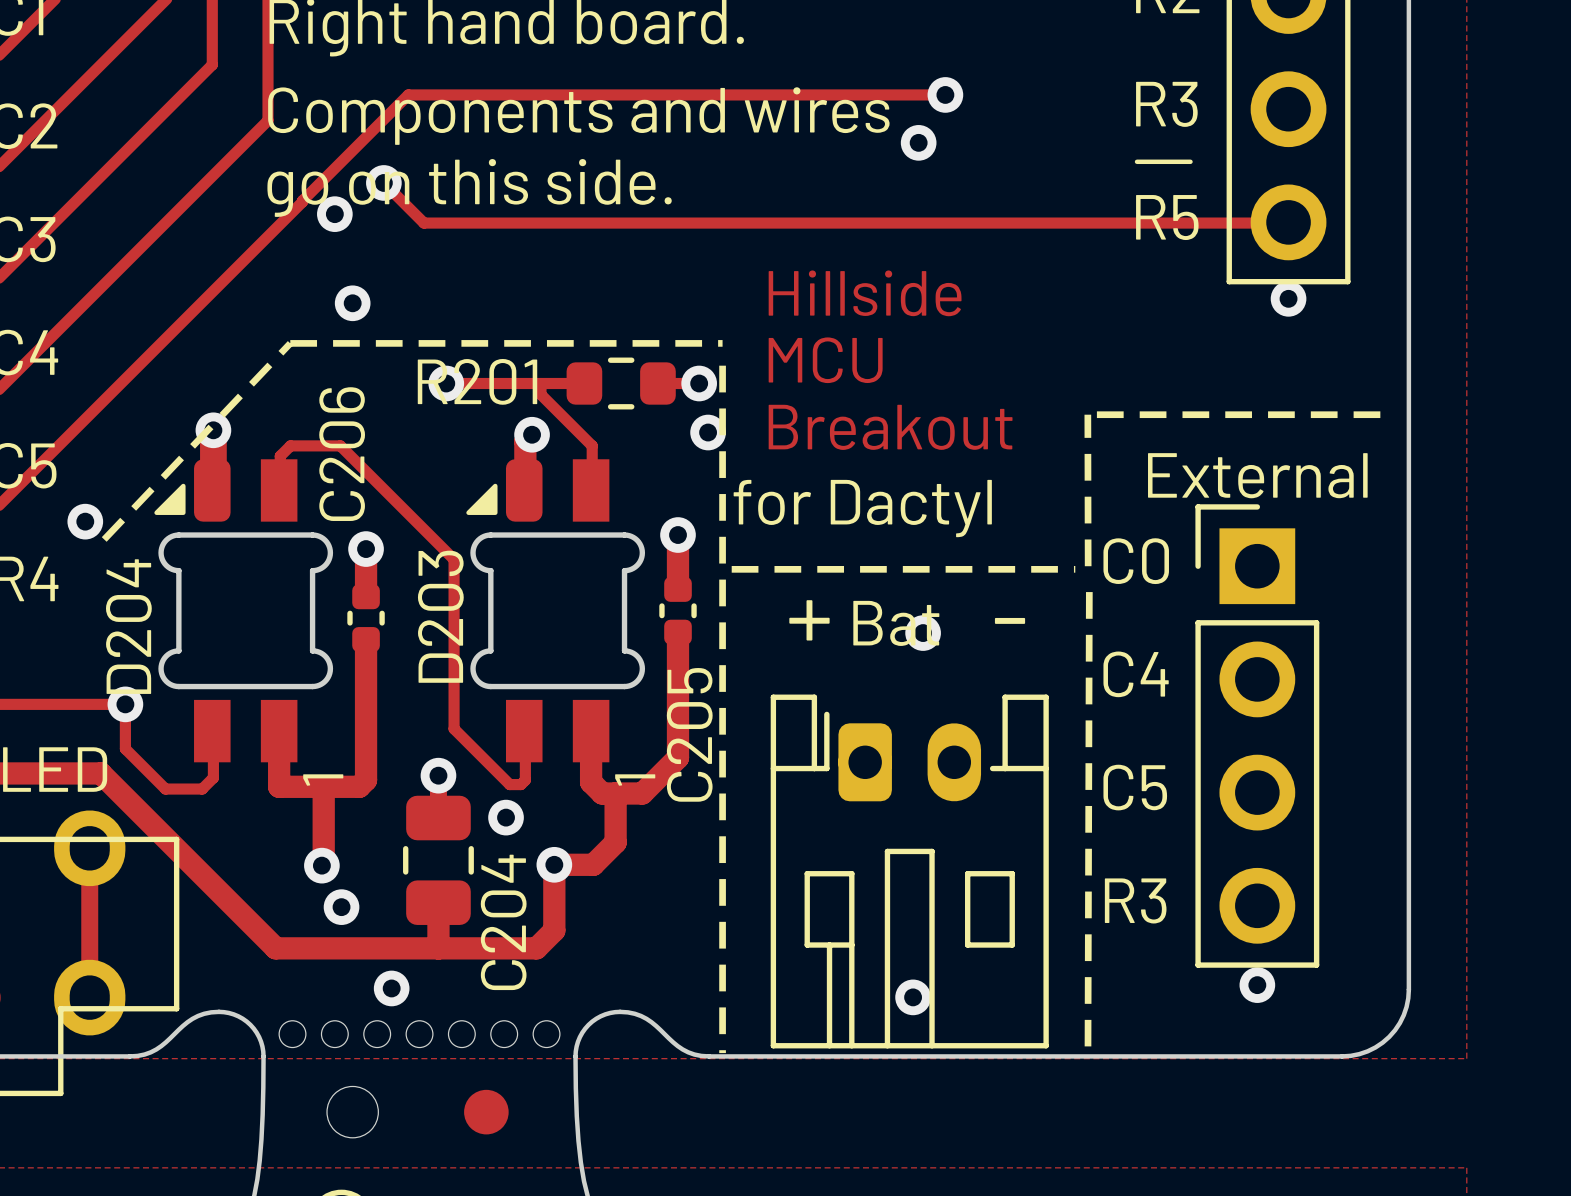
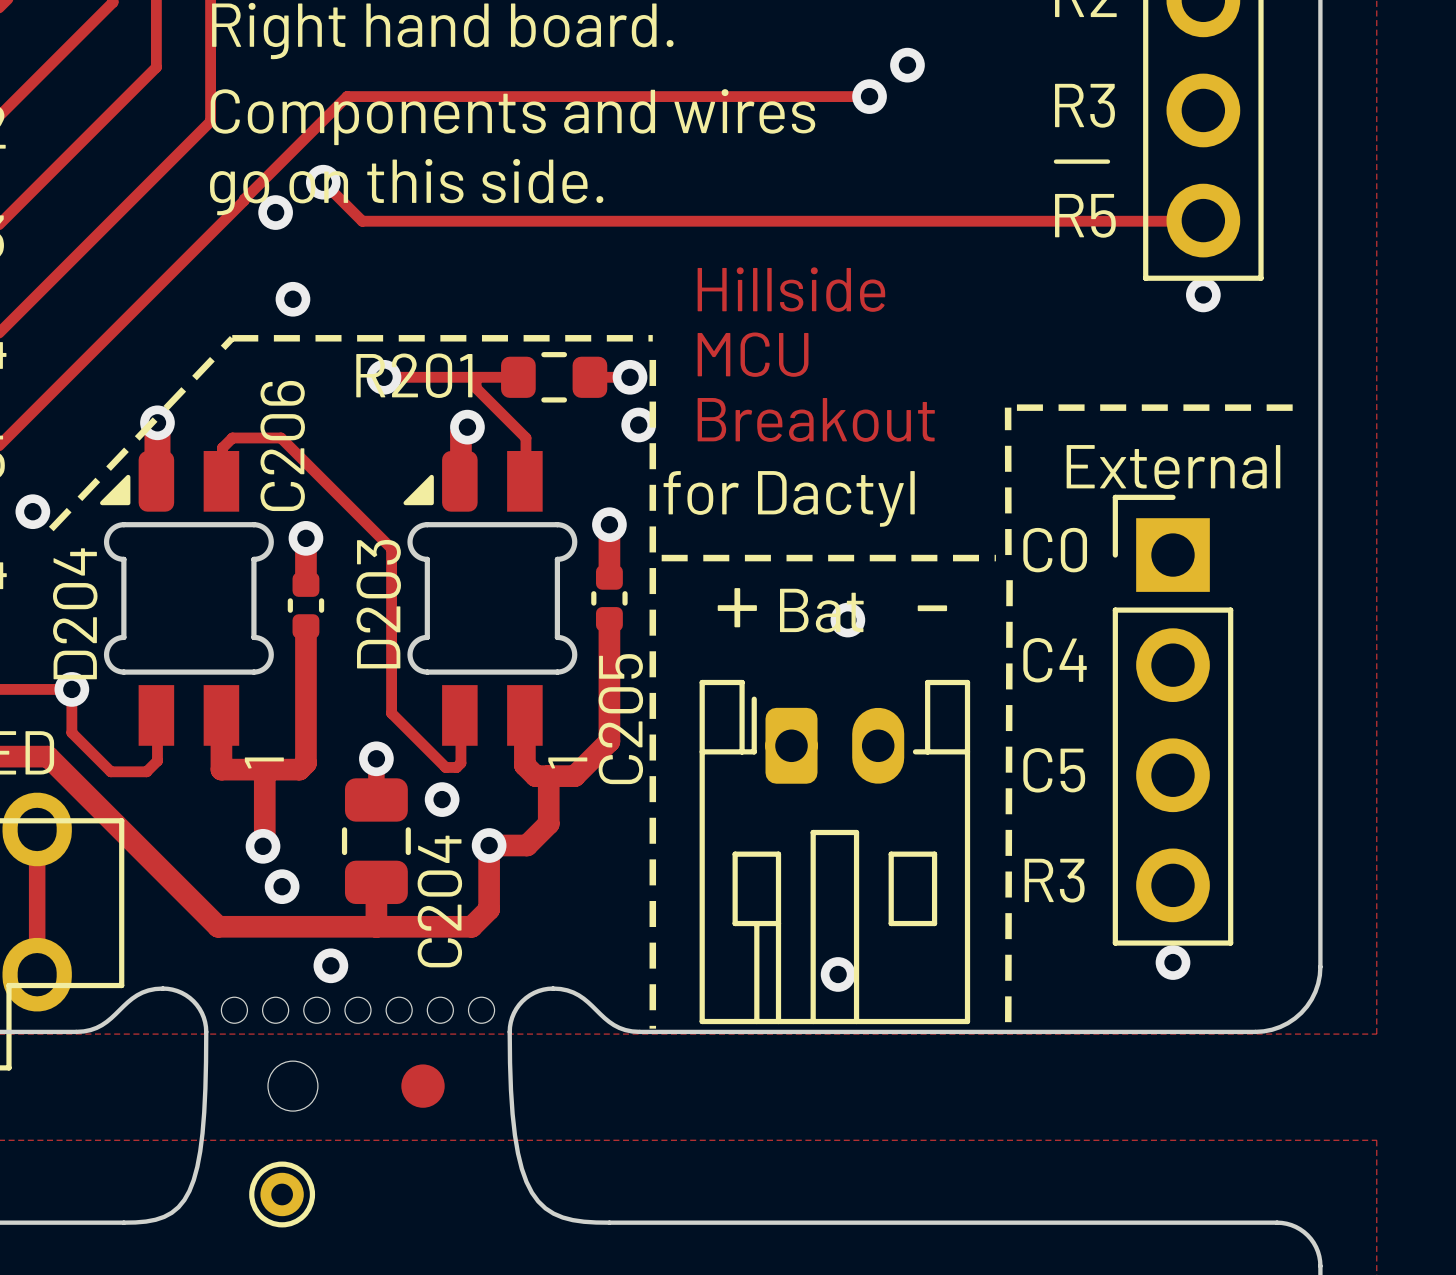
via position: (918, 142) -> (907, 65)

